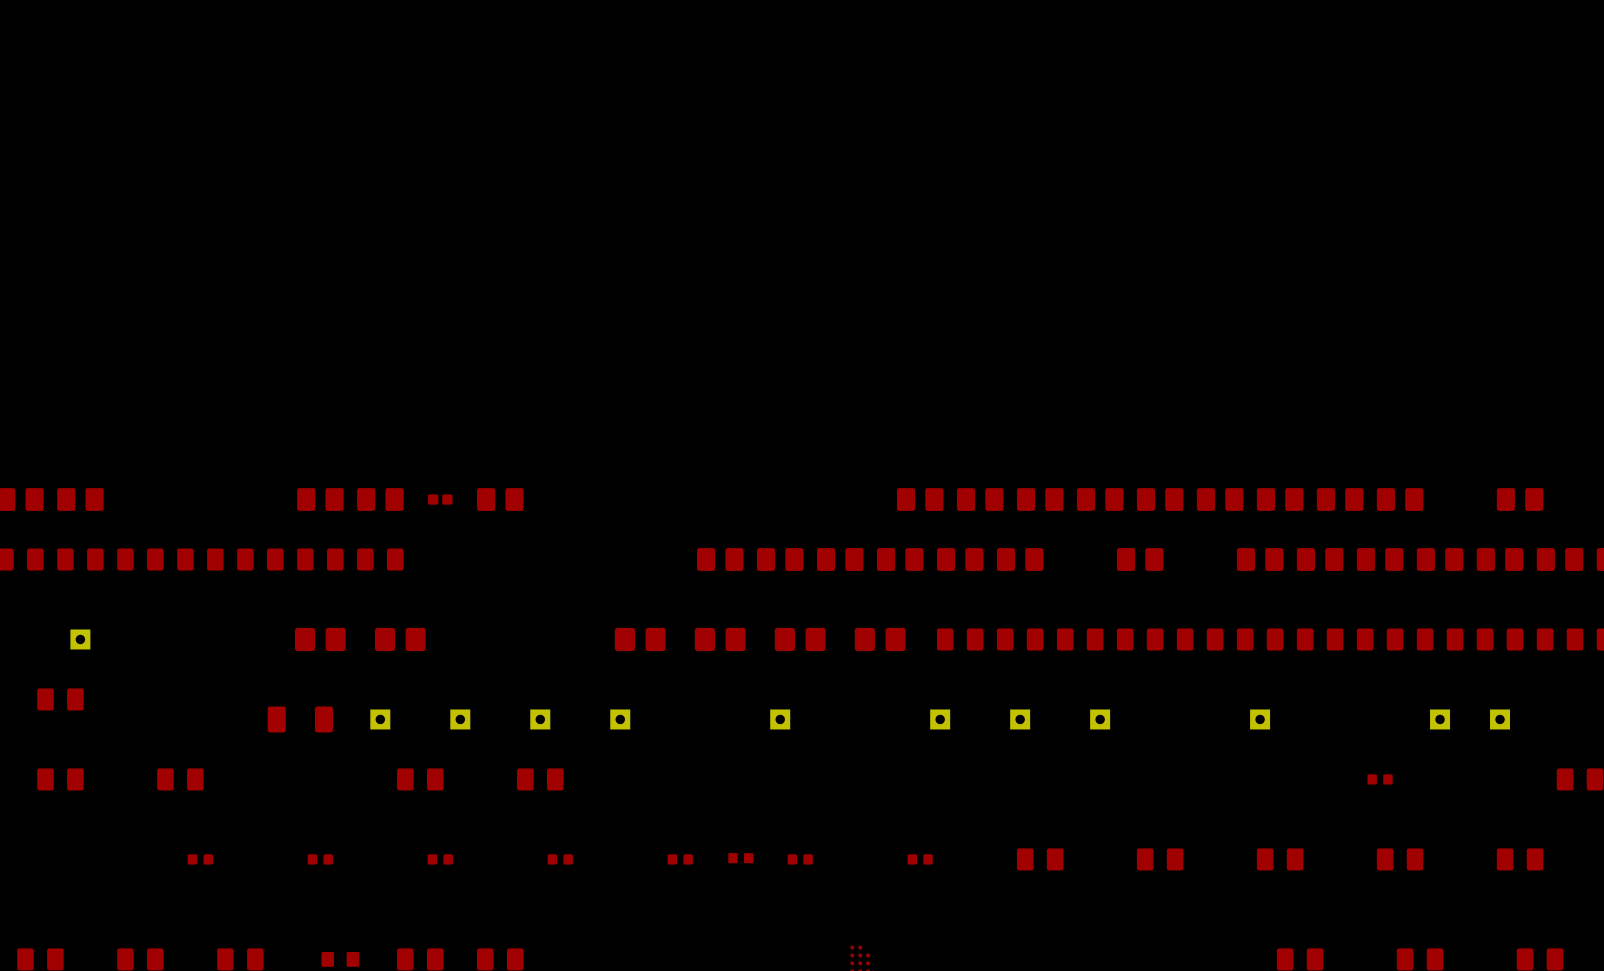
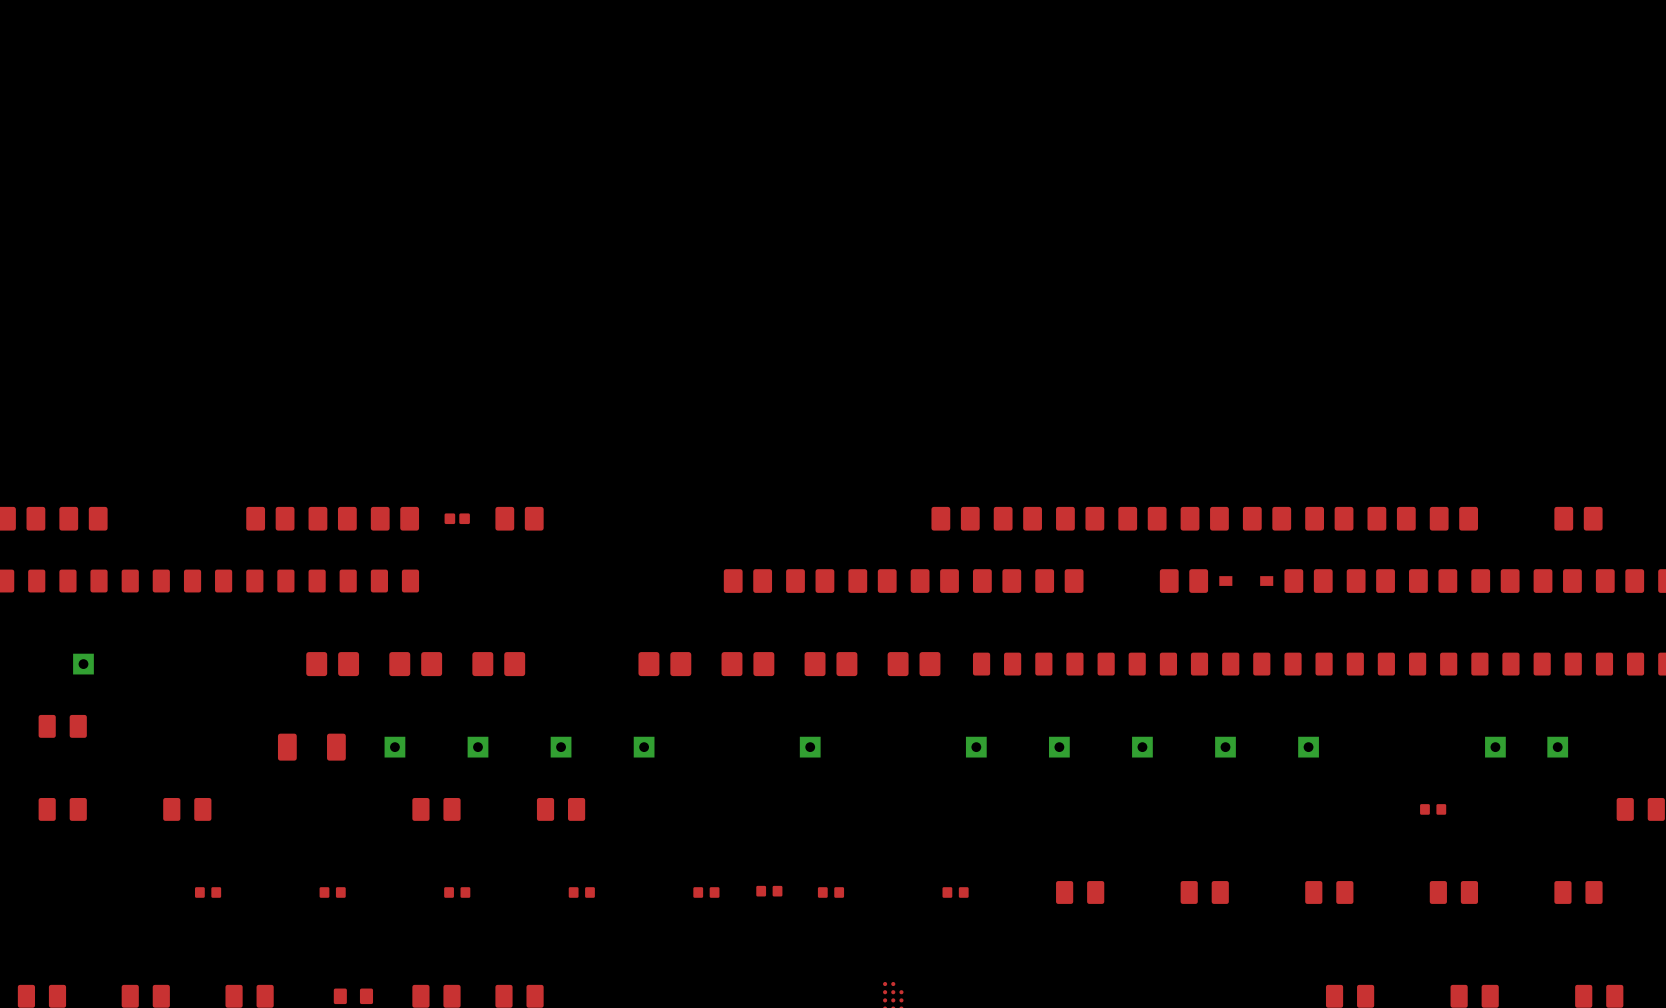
part: none -> (270, 518)
part: none -> (1246, 581)
part: none -> (498, 664)
part: none -> (1225, 747)

